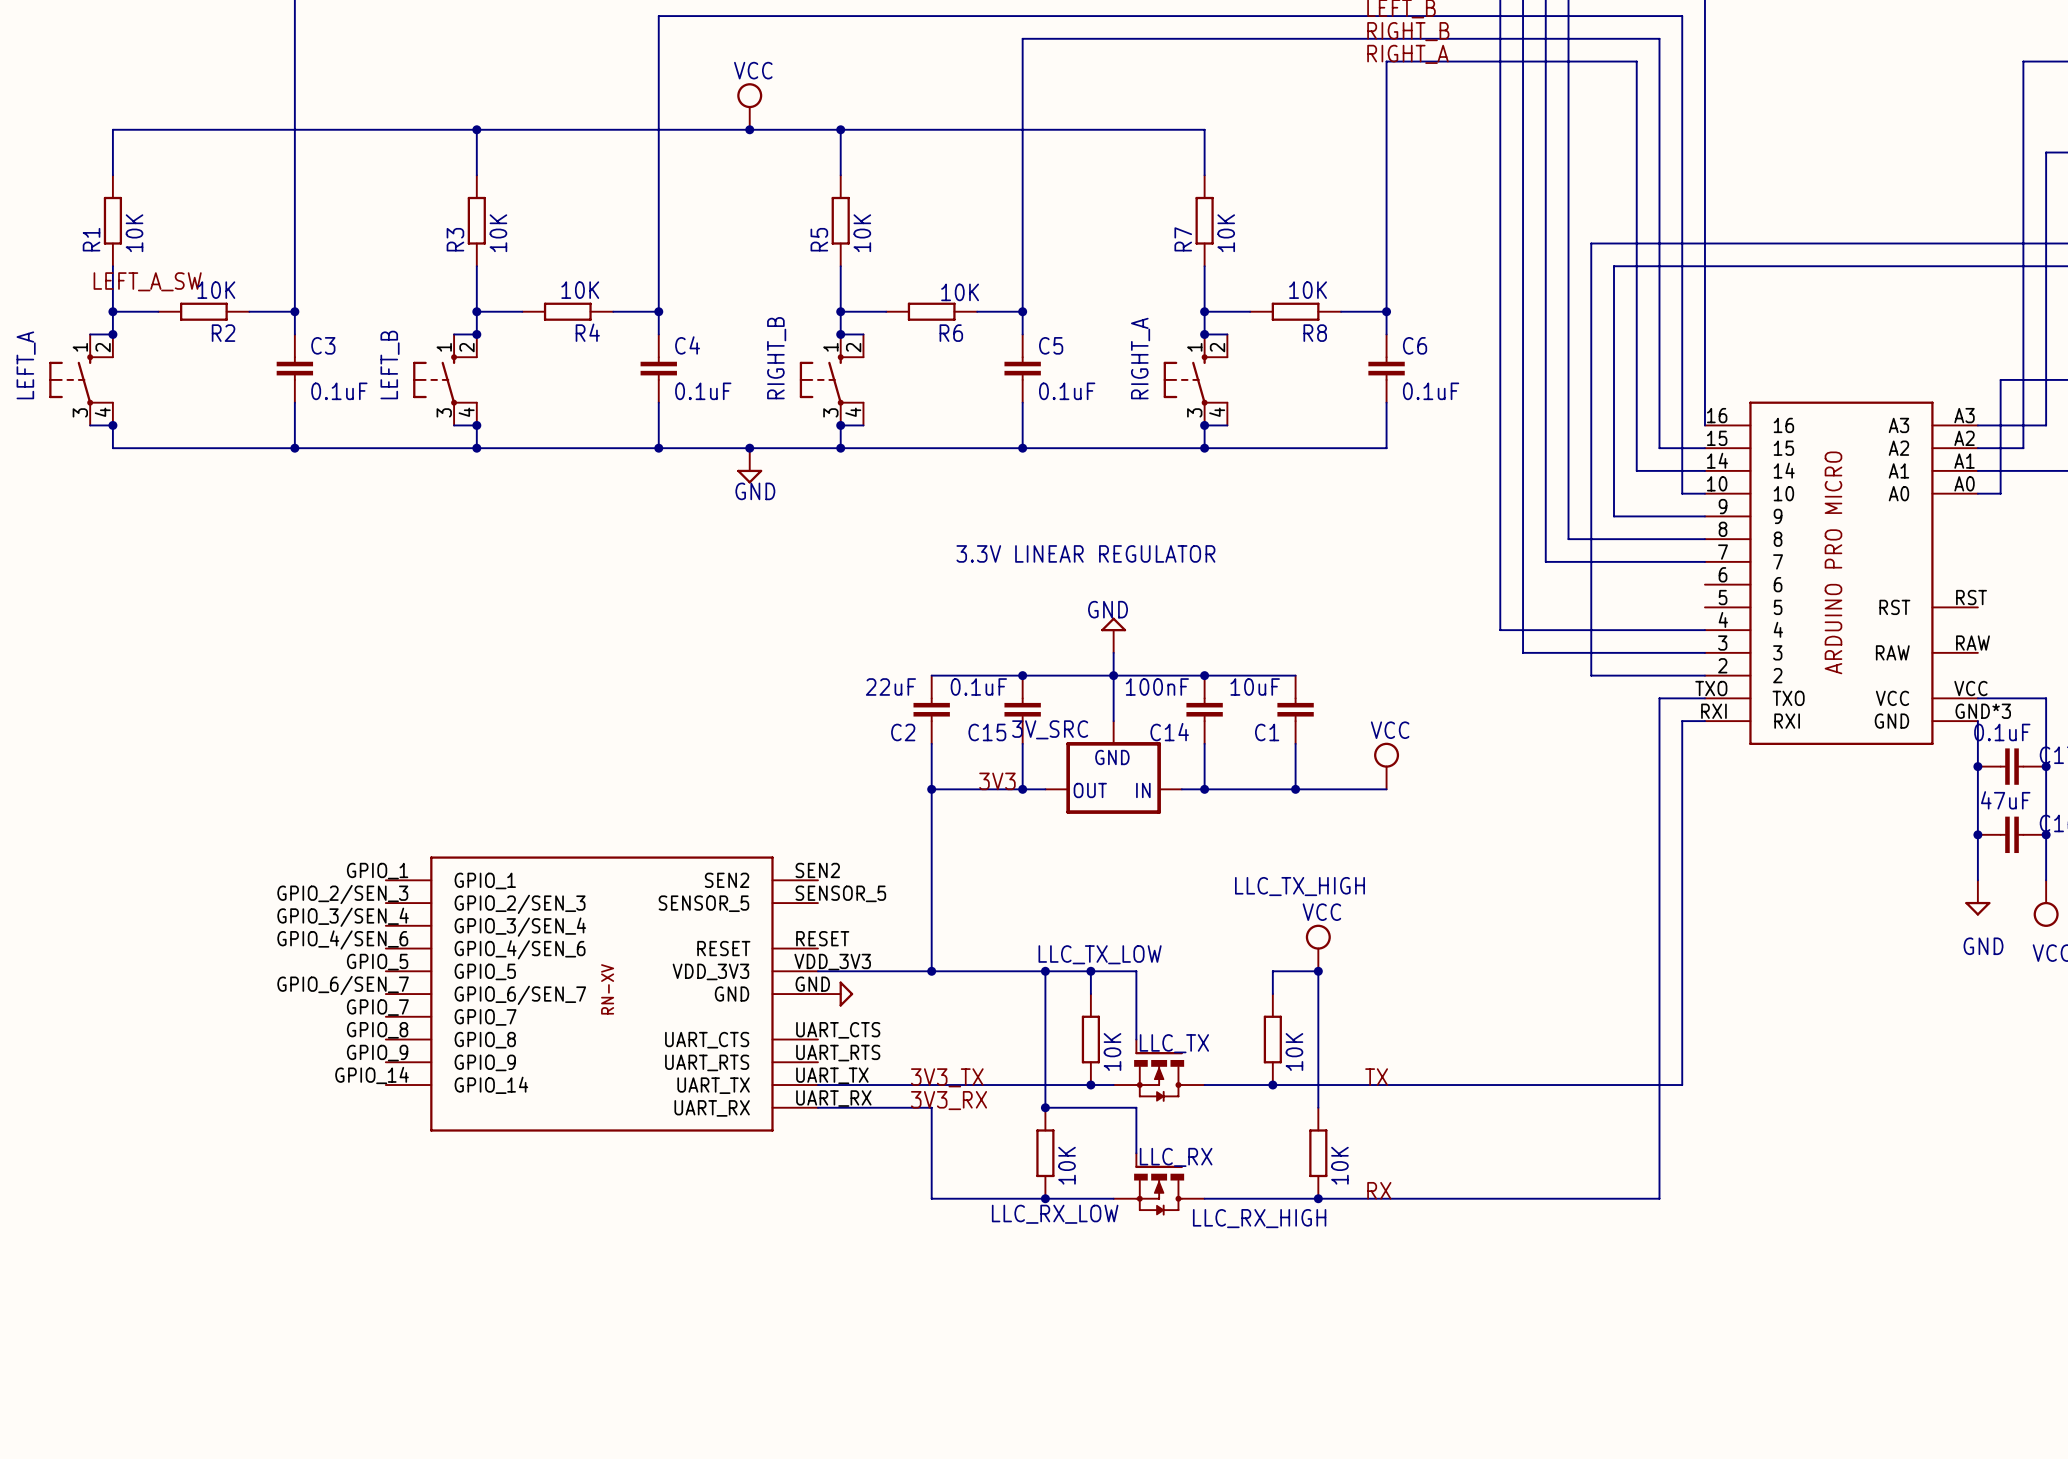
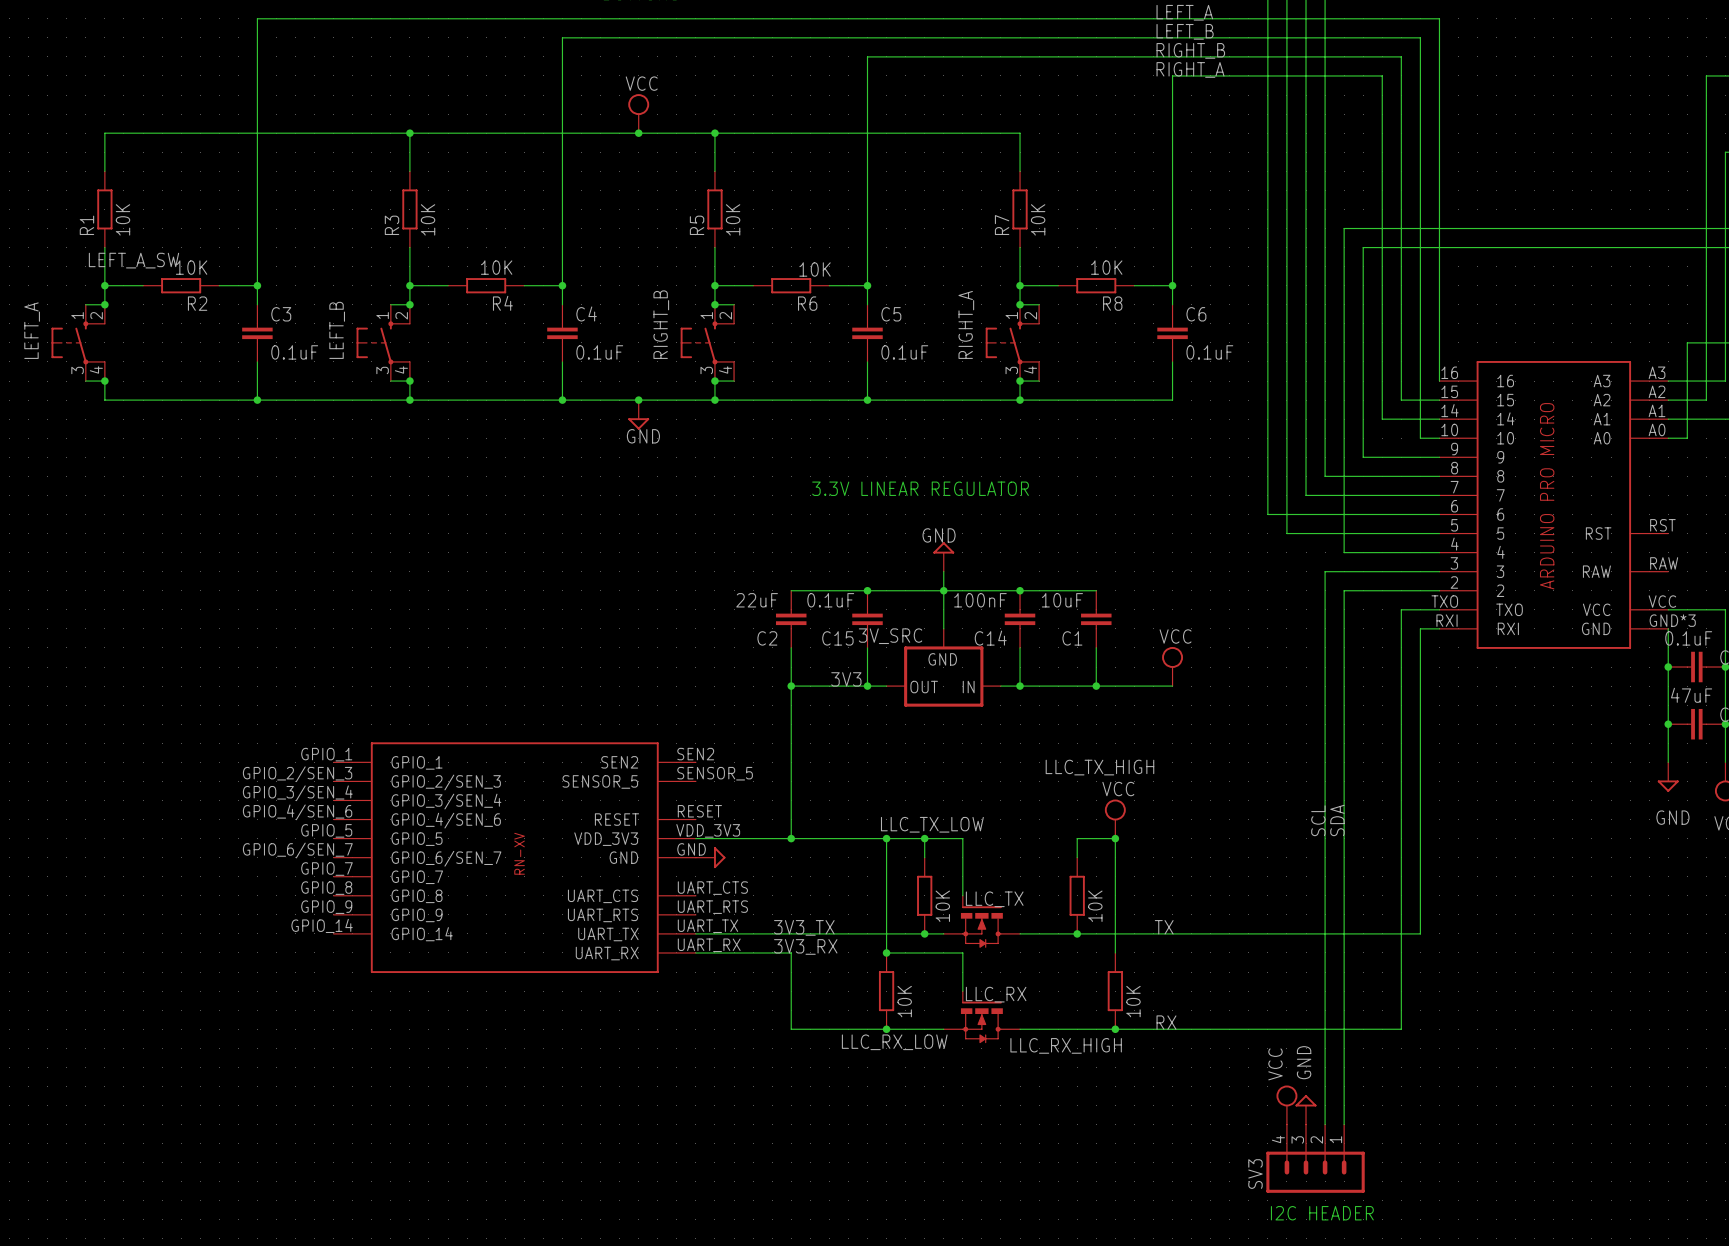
wire: (1500, 584) (1500, 630) (1591, 630) (1591, 675) -> (1267, 514) (1439, 514)
wire: (1523, 607) (1523, 652) (1568, 652) -> (1286, 533) (1439, 533)
wire: none -> (1325, 571) (1325, 1124)
wire: none -> (1344, 590) (1344, 1124)
label: none -> SCL (1318, 820)
label: none -> SDA (1337, 820)
power symbol: none -> VCC (1286, 1105)
power symbol: none -> GND (1306, 1109)
SV3: none -> (1315, 1158)
text: none -> I2C HEADER (1322, 1213)

